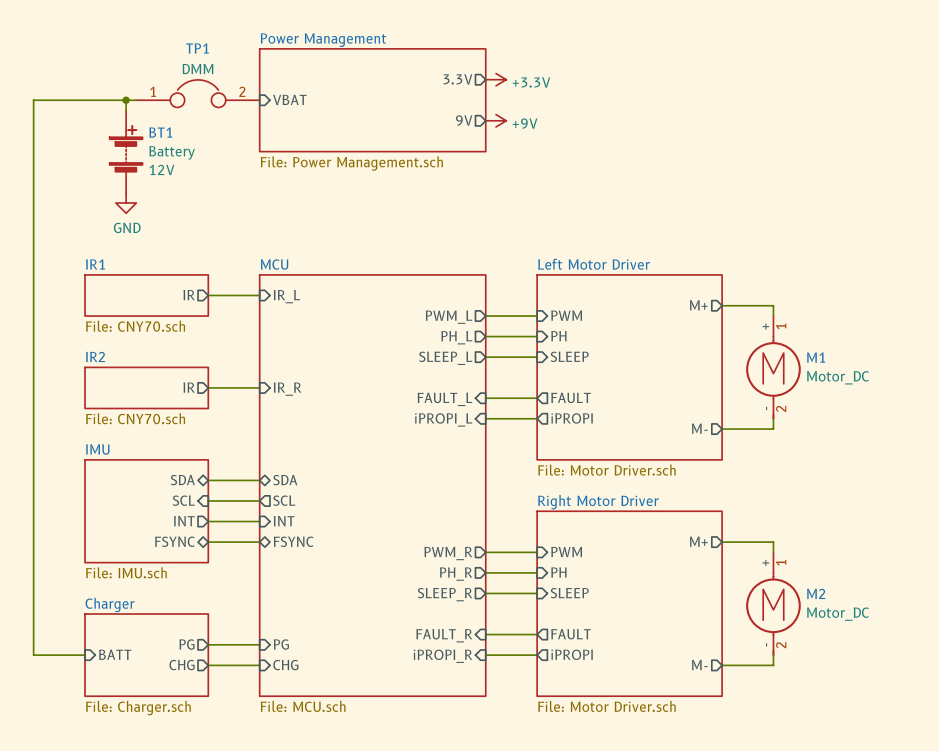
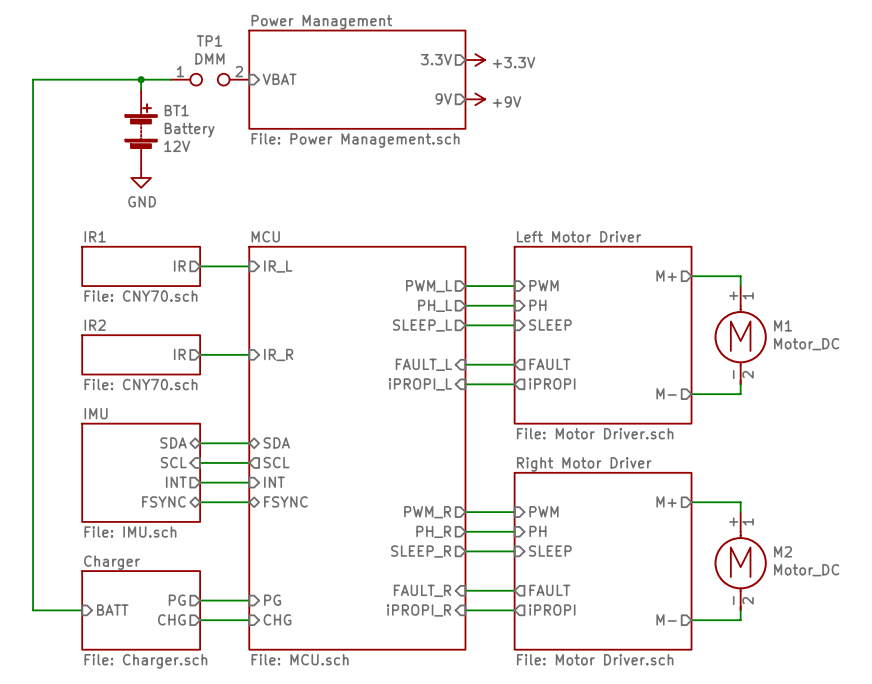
TP1 symbol: [136, 79, 260, 108] -> [170, 73, 250, 86]
wire: (126, 100) (126, 110) -> (141, 79) (141, 89)
junction position: (126, 100) -> (141, 79)
BT1 position: (126, 151) -> (141, 128)
power symbol position: GND (126, 202) -> GND (141, 177)

